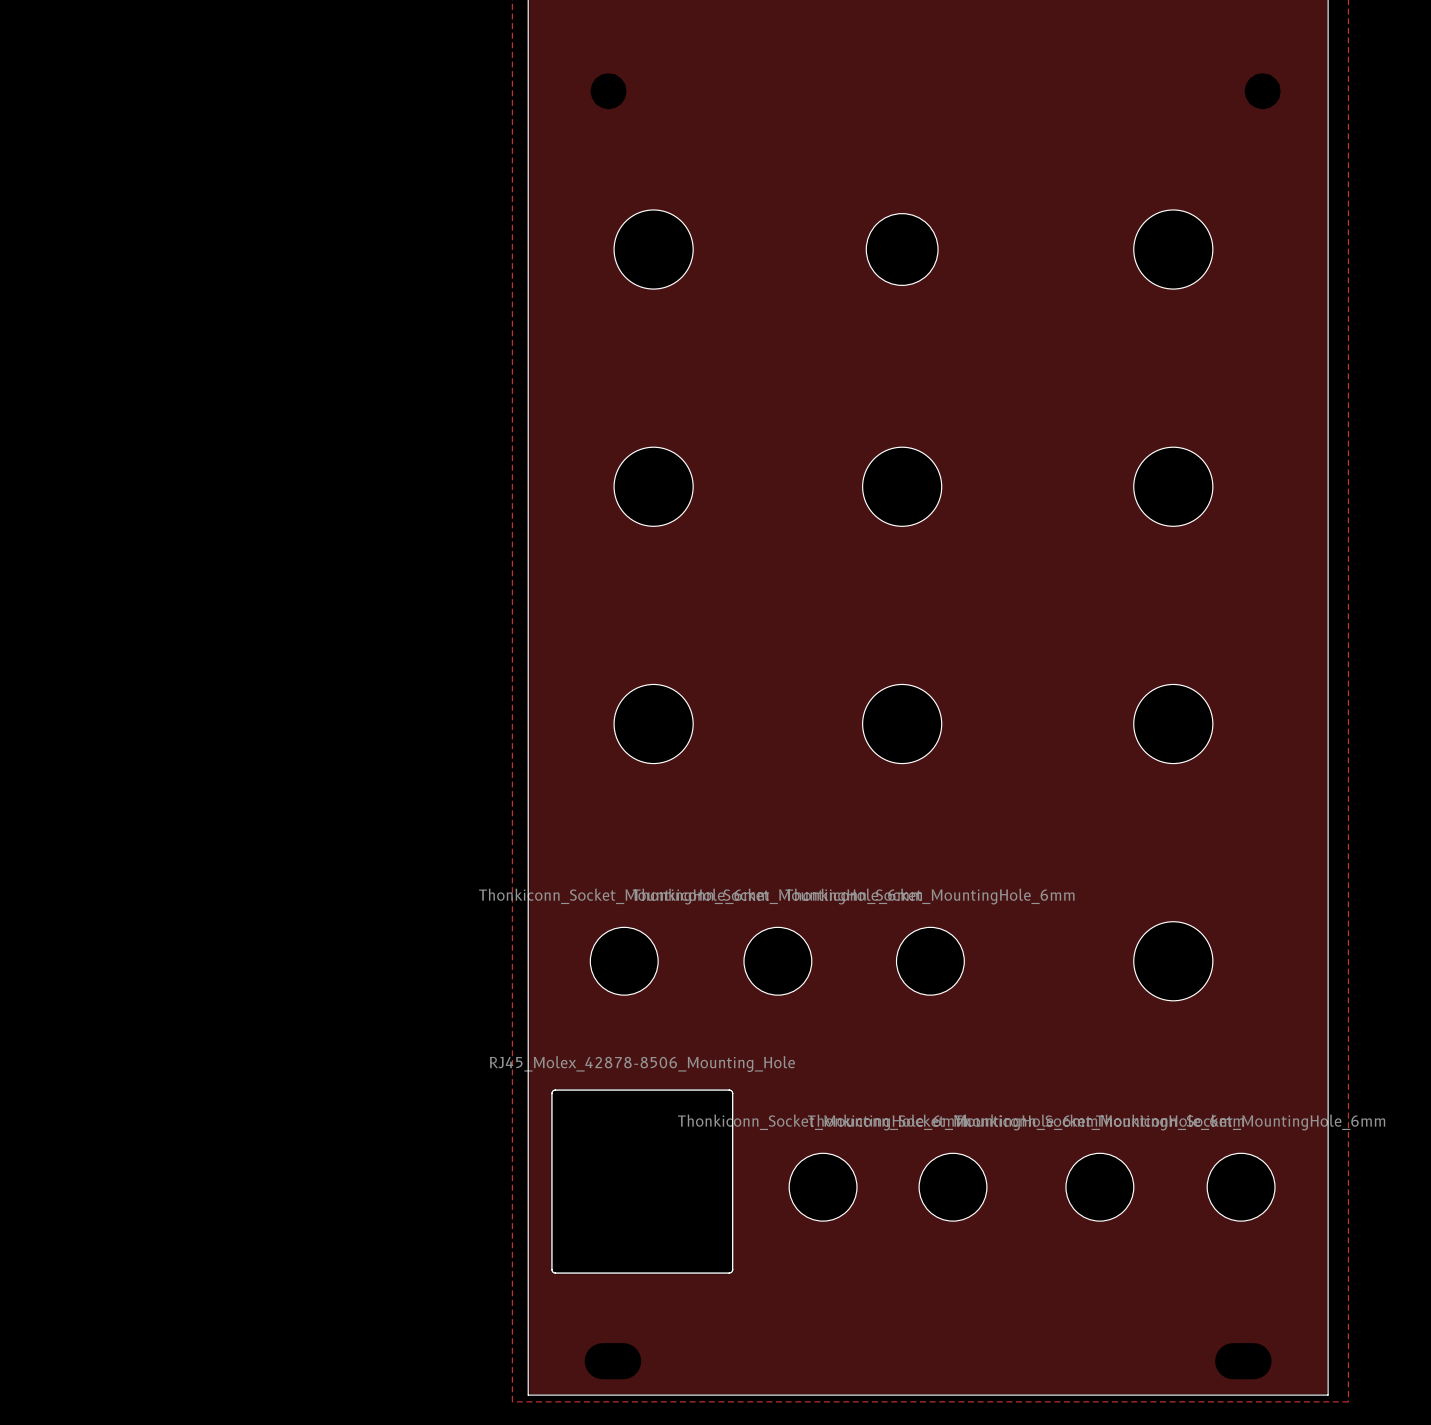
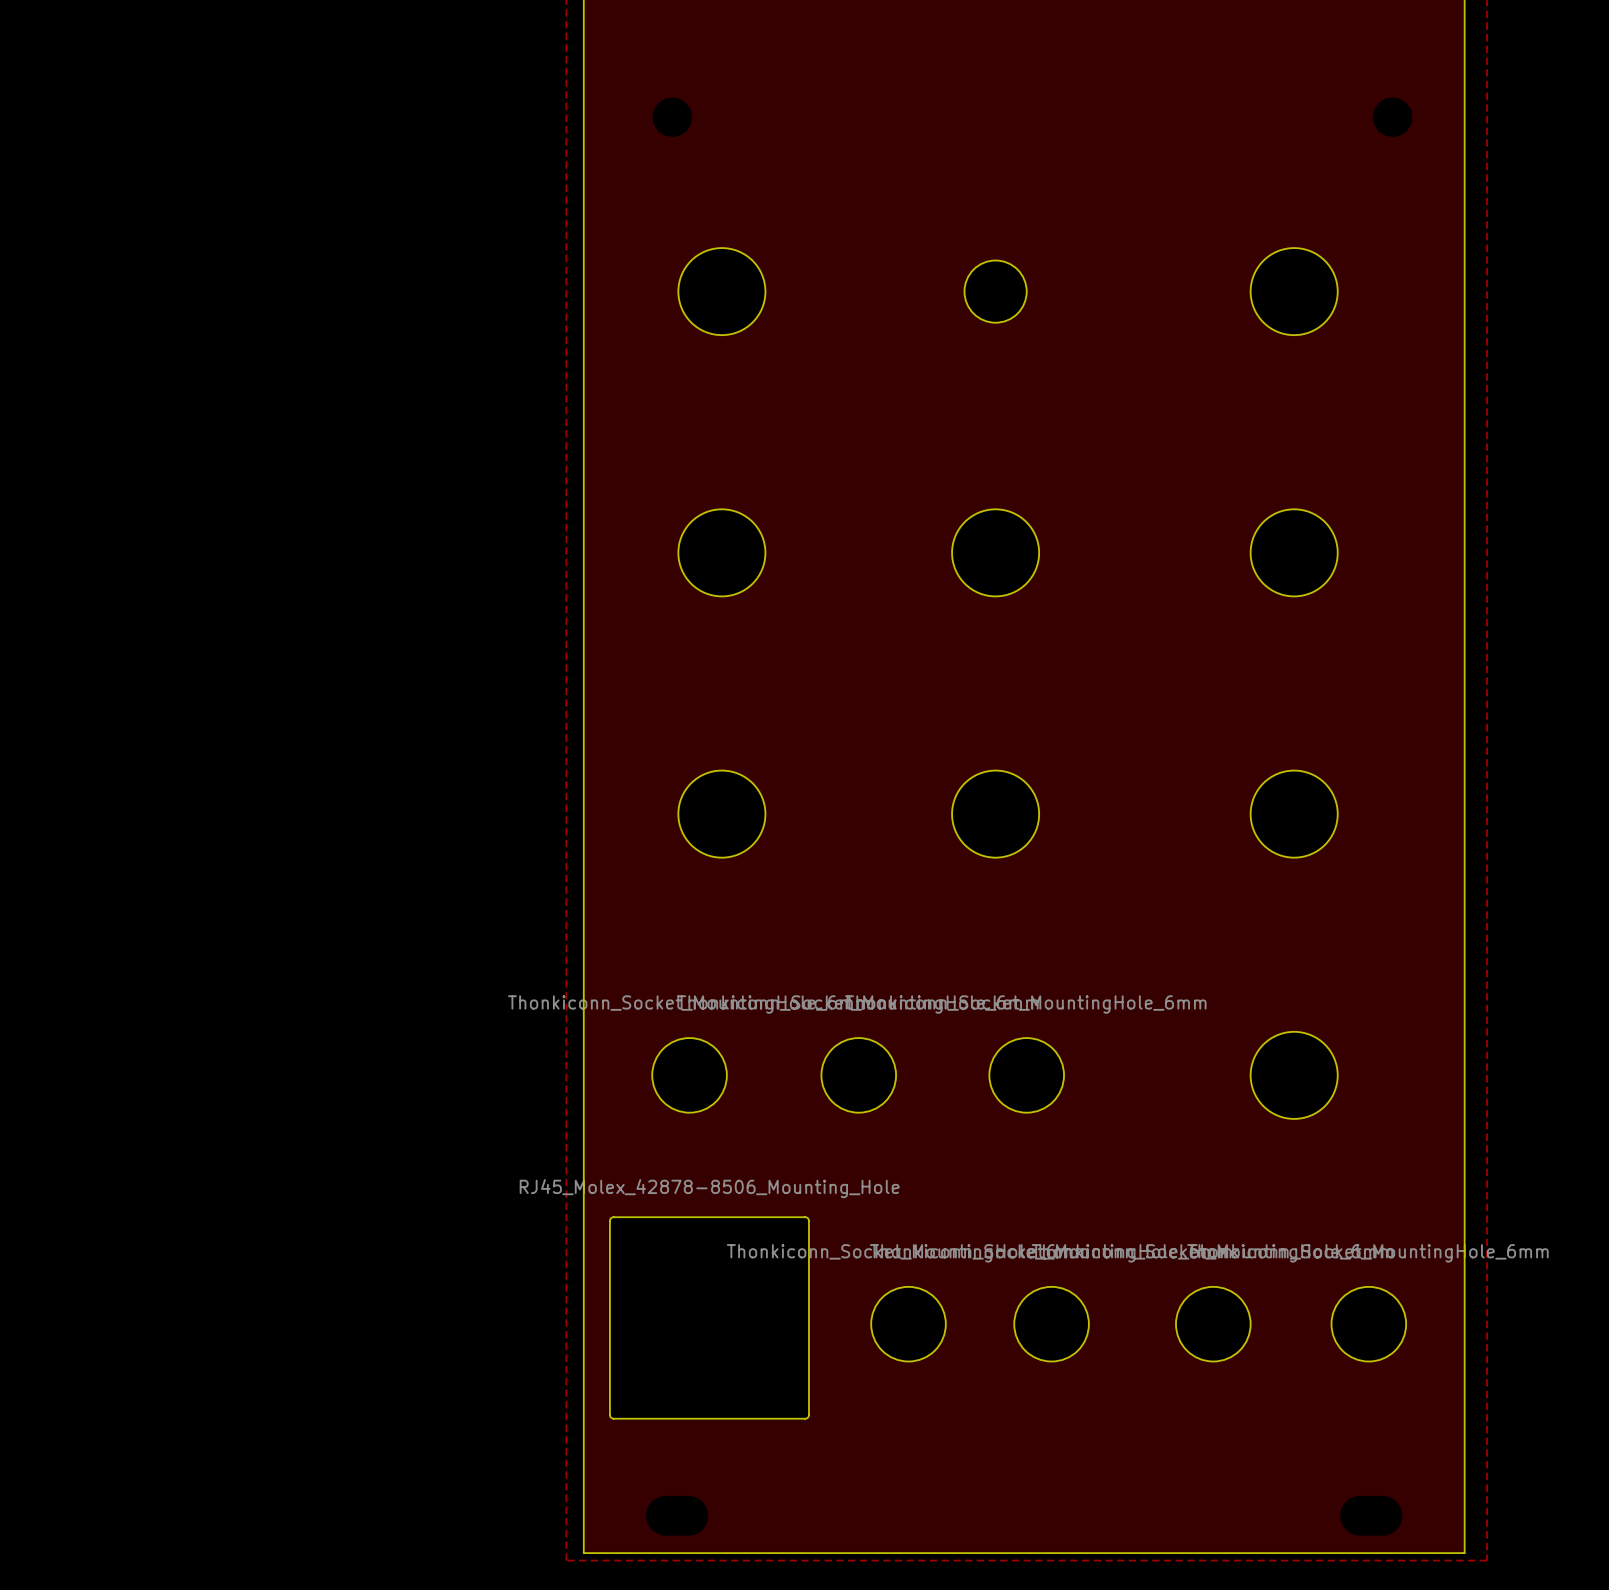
part footprint: [866, 213, 939, 286] -> [964, 260, 1027, 323]

